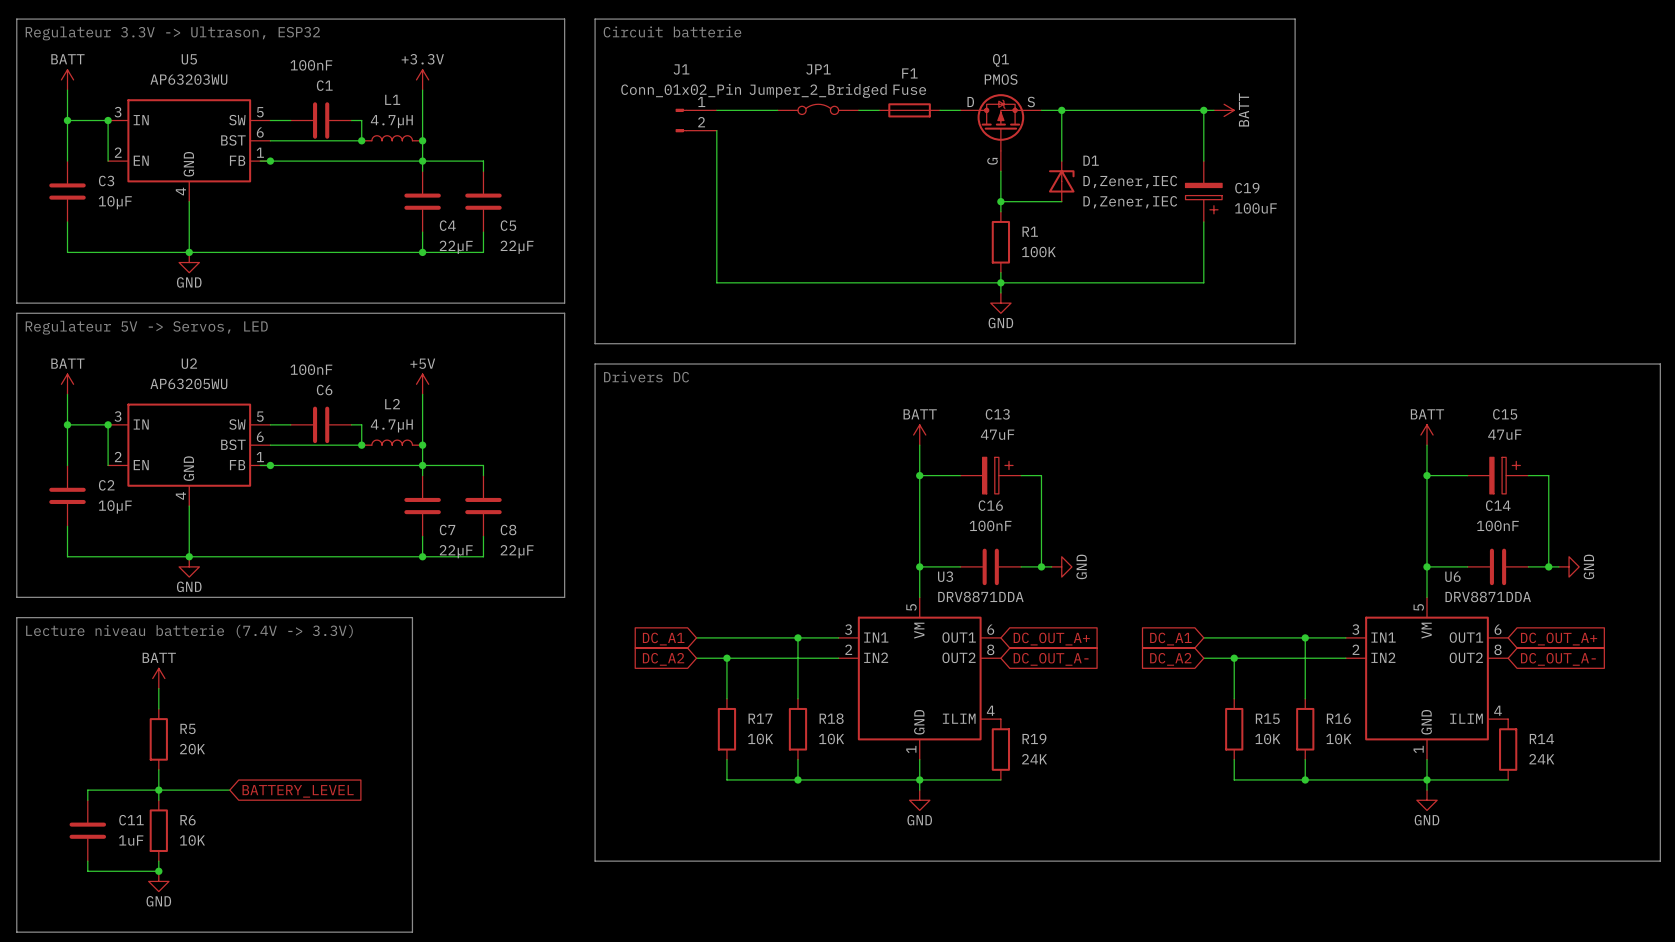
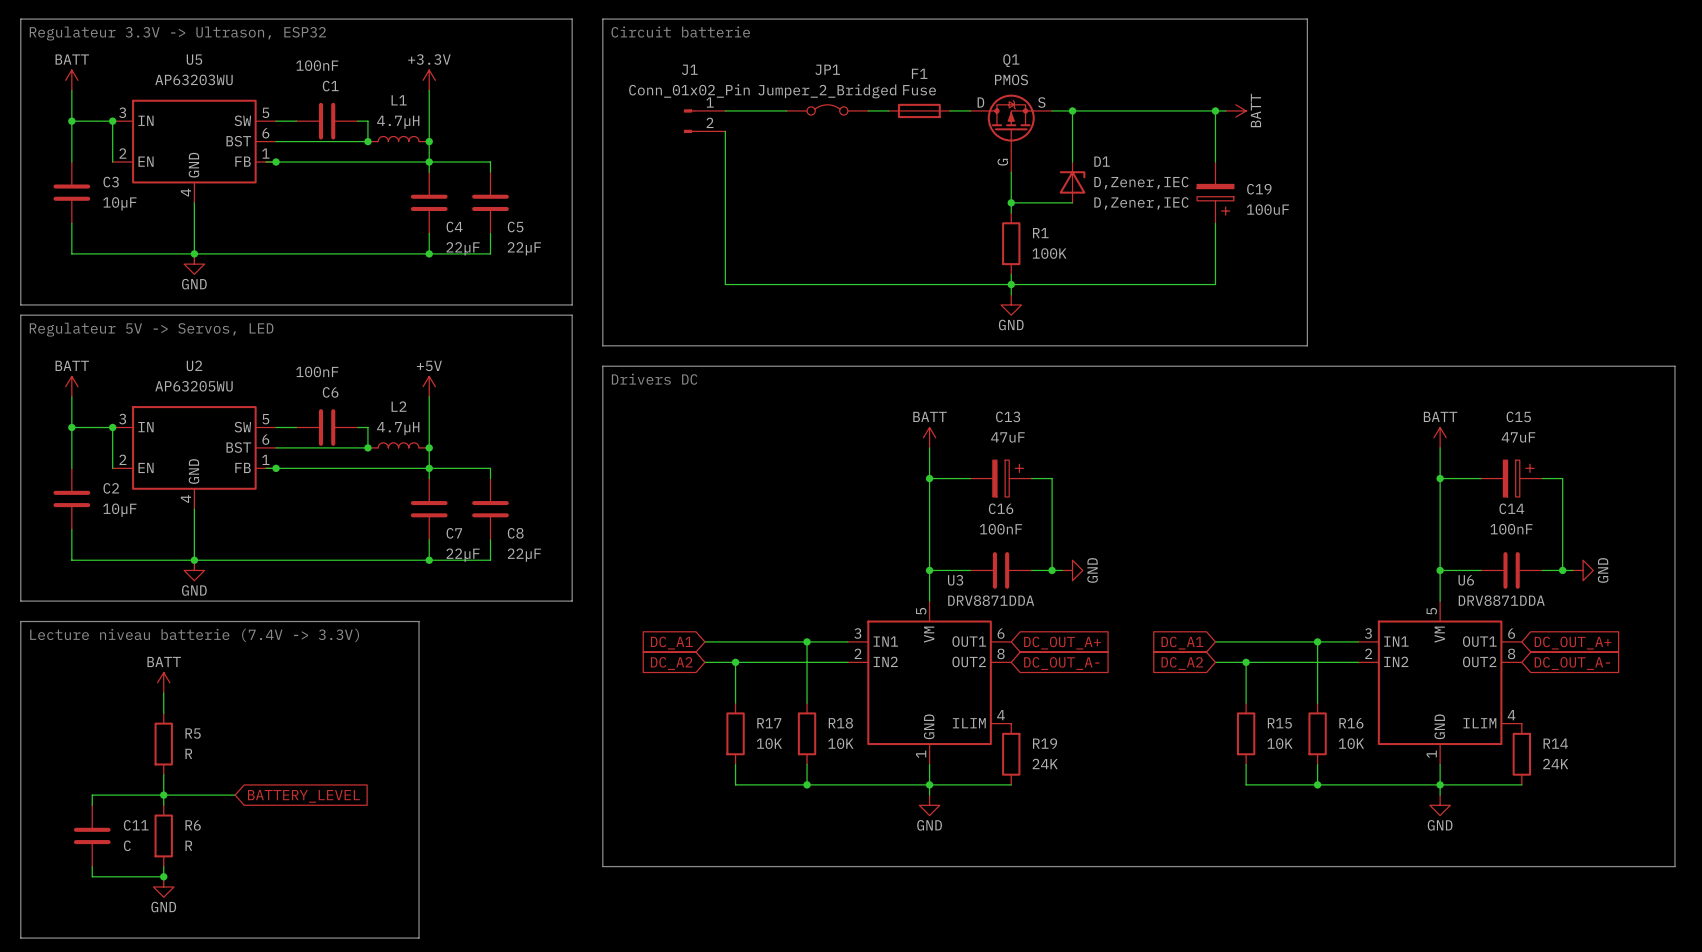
R5 value: 20K (192, 749) -> R (188, 753)
C11 value: 1uF (131, 840) -> C (127, 845)
R6 value: 10K (192, 840) -> R (188, 845)

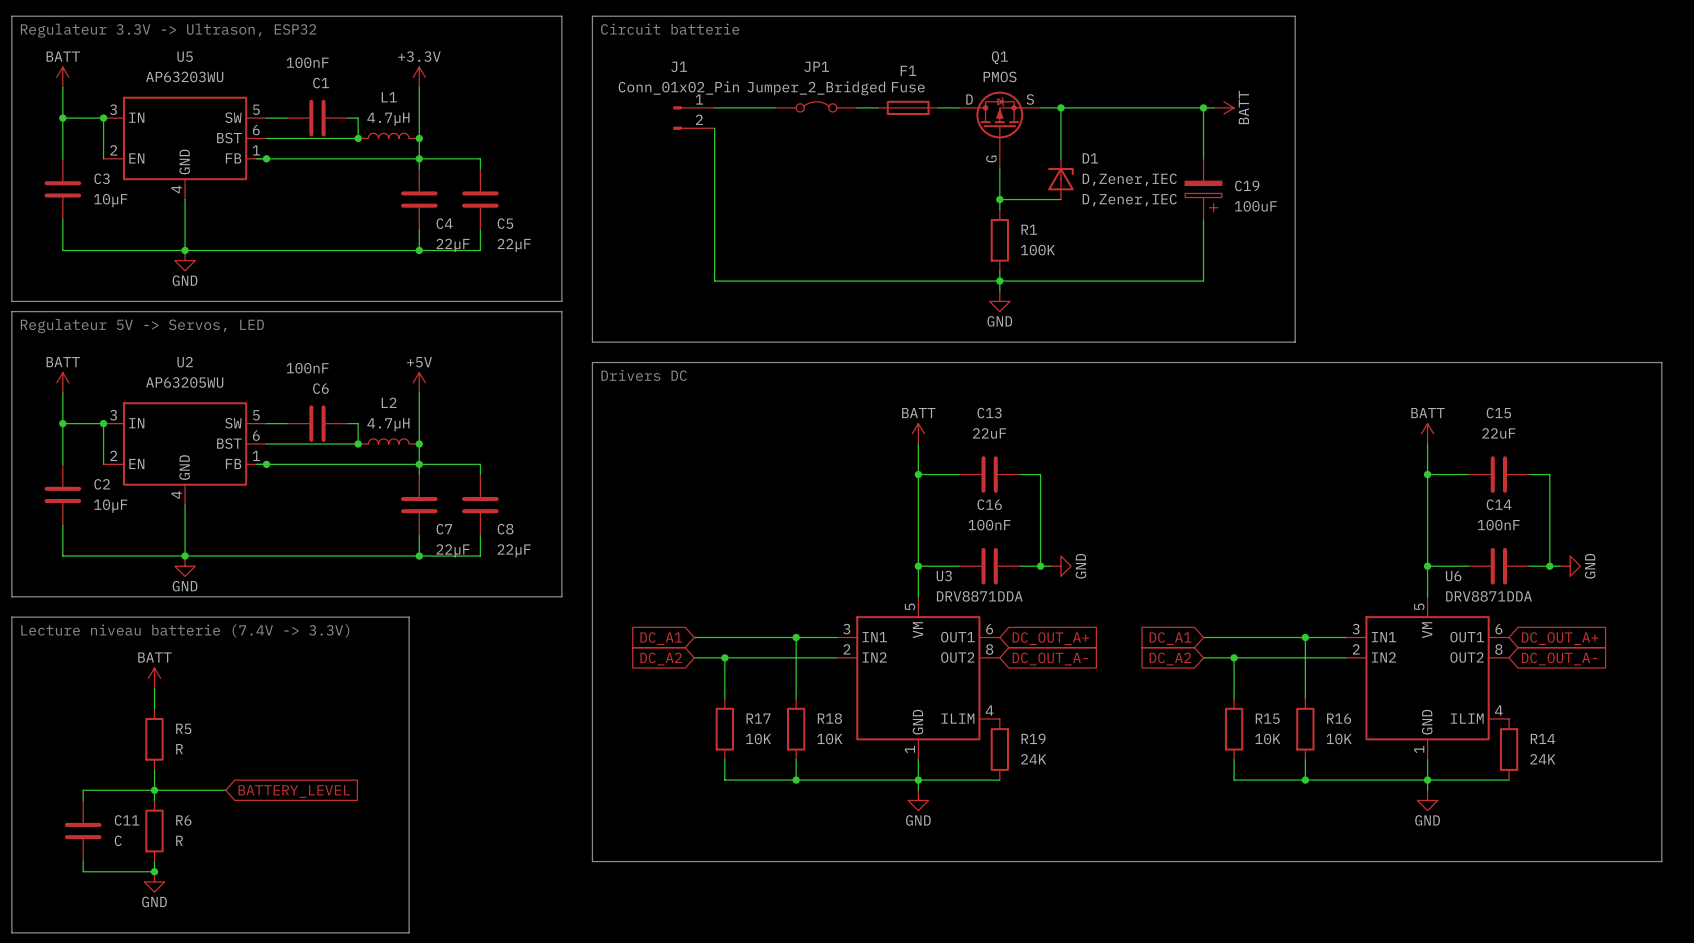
C13 value: 47uF (1007, 437) -> 22uF (989, 433)
C15 value: 47uF (1518, 437) -> 22uF (1498, 433)
C13 symbol: [970, 460, 1032, 497] -> [959, 456, 1021, 493]
C15 symbol: [1480, 460, 1543, 497] -> [1468, 456, 1530, 493]

